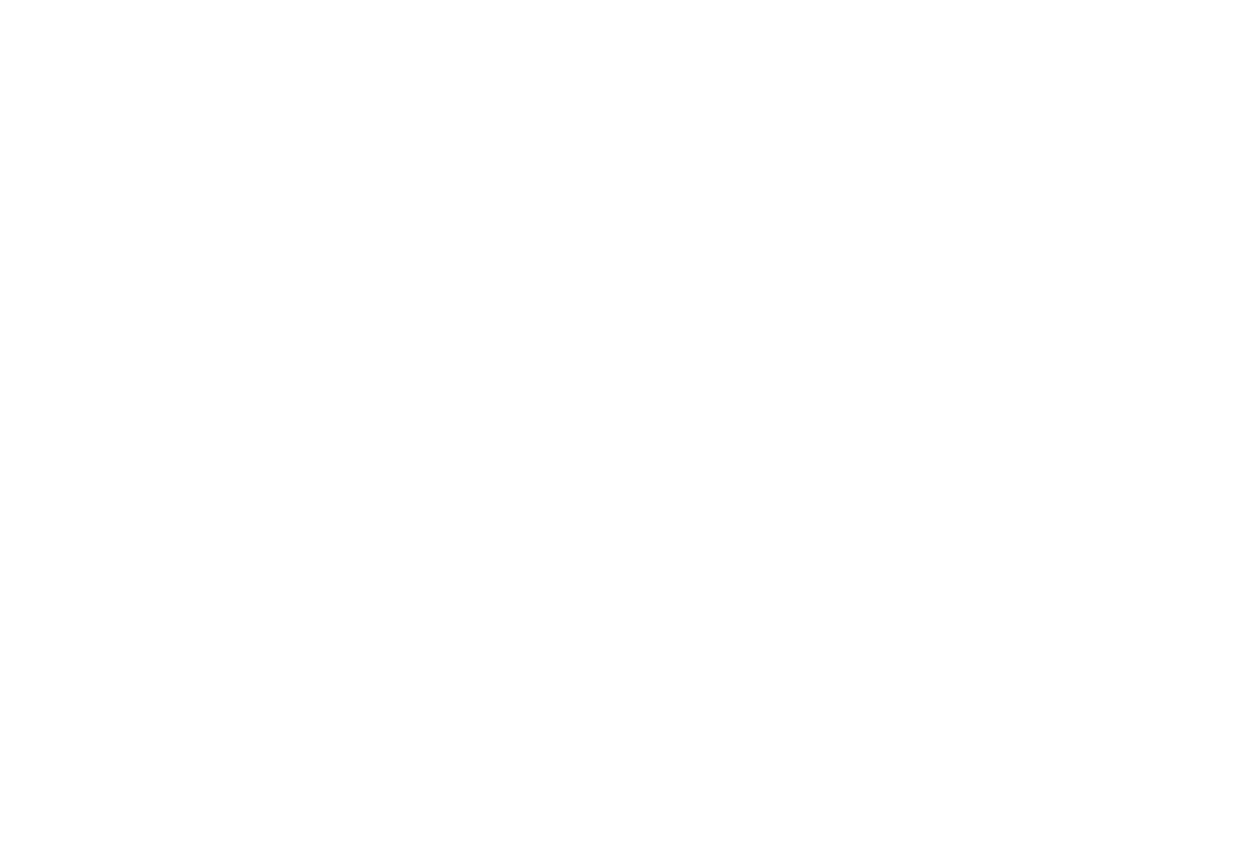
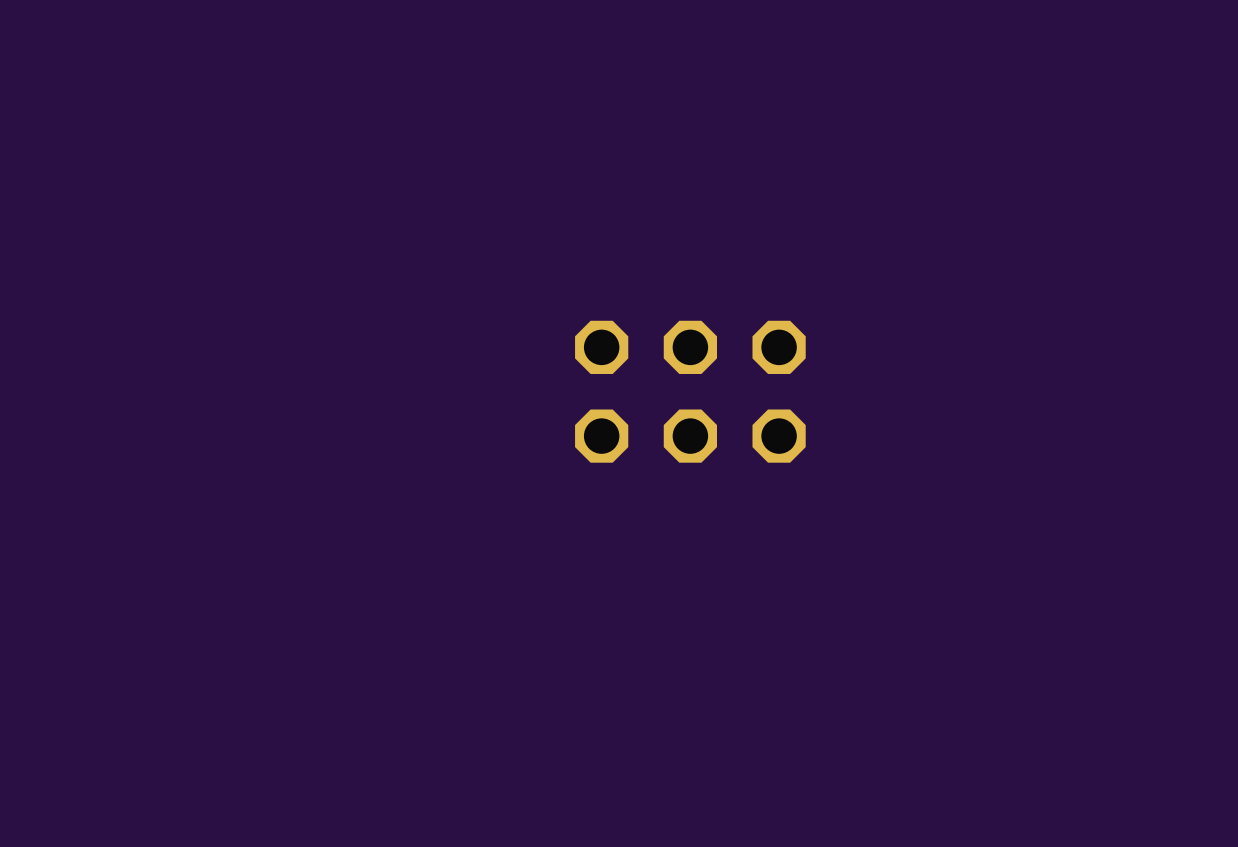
part: none -> (690, 391)

